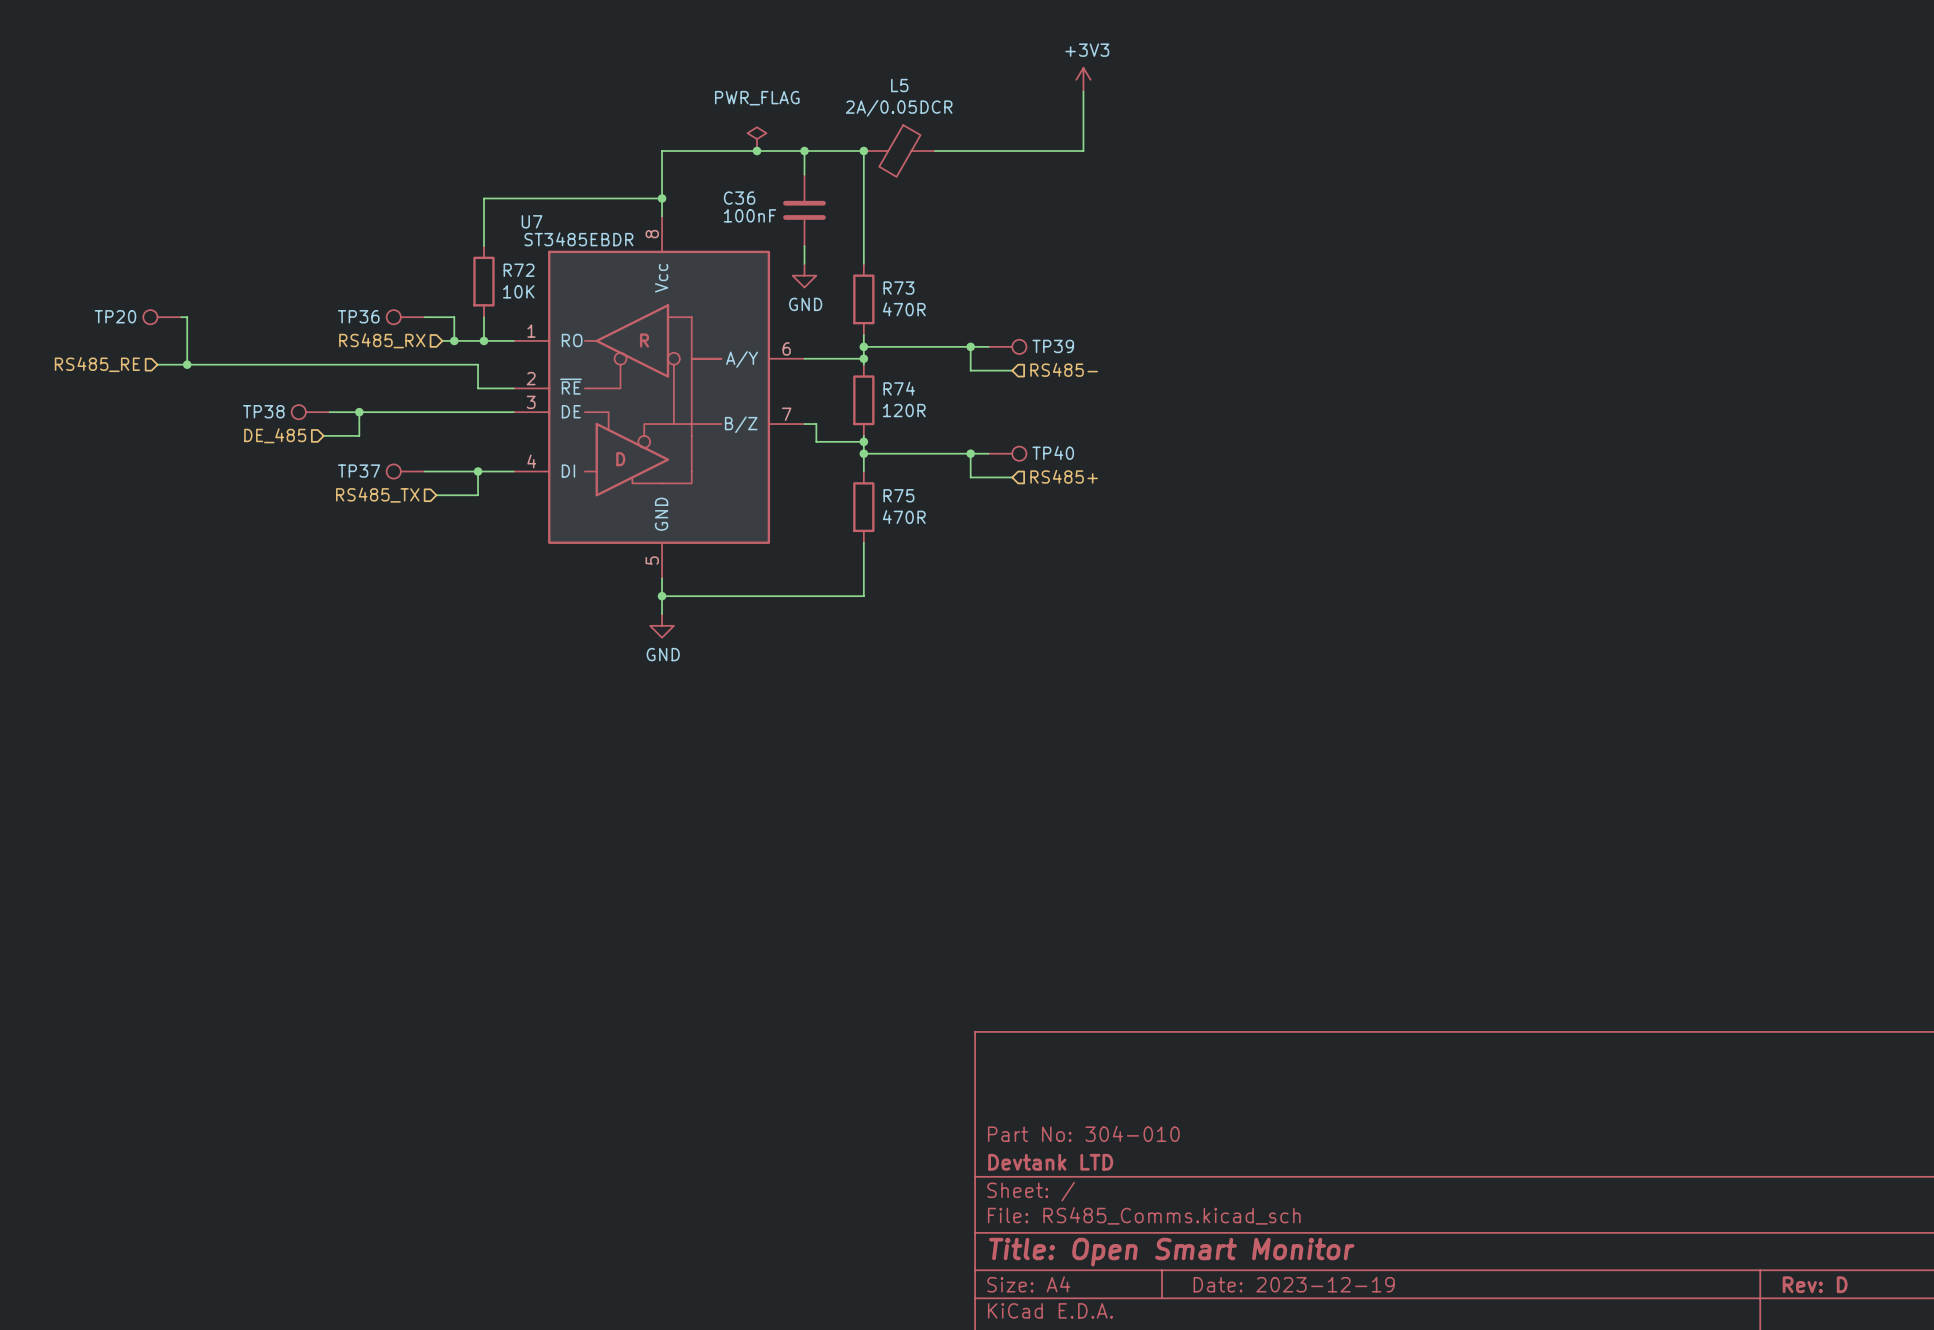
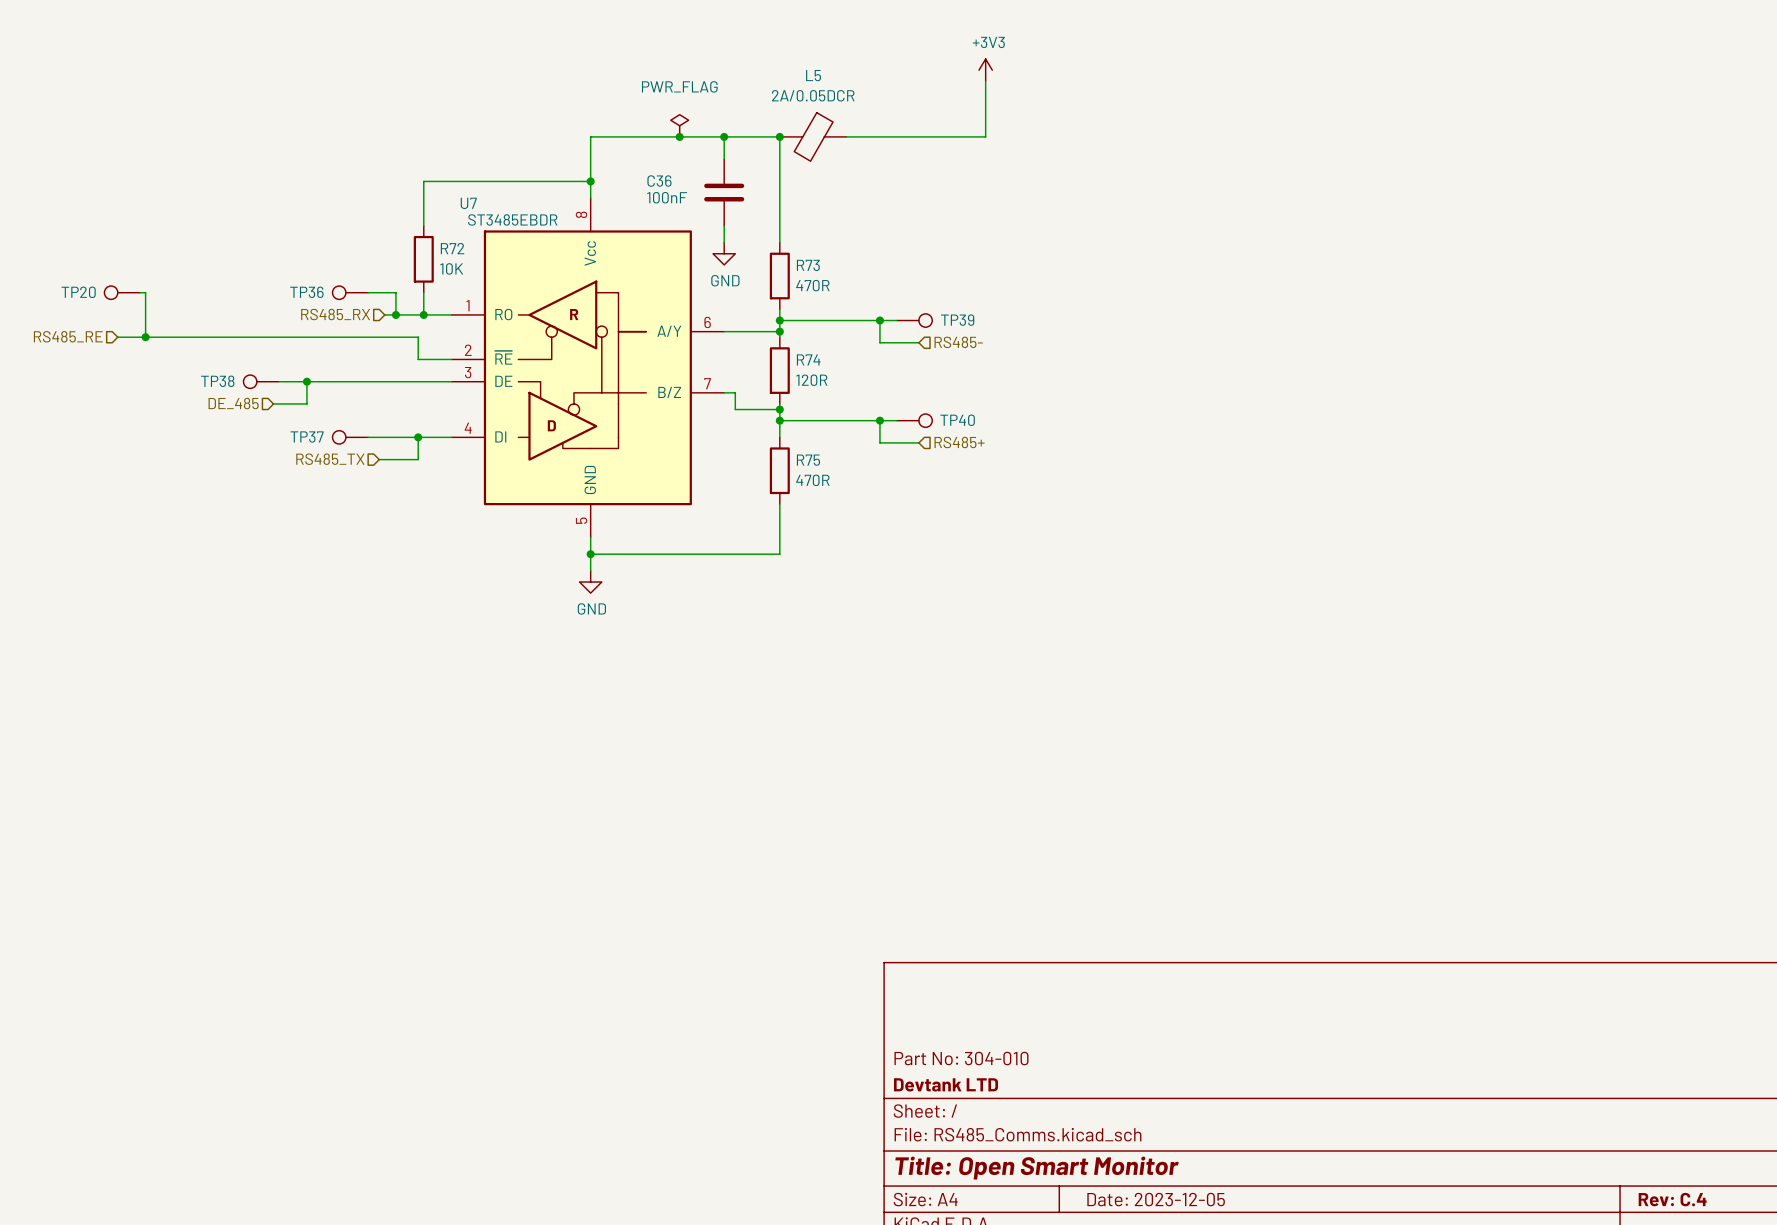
title block: Date: 2023-12-19 (1294, 1284) -> Date: 2023-12-05 (1156, 1199)
title block: Rev: D (1815, 1284) -> Rev: C.4 (1672, 1199)

